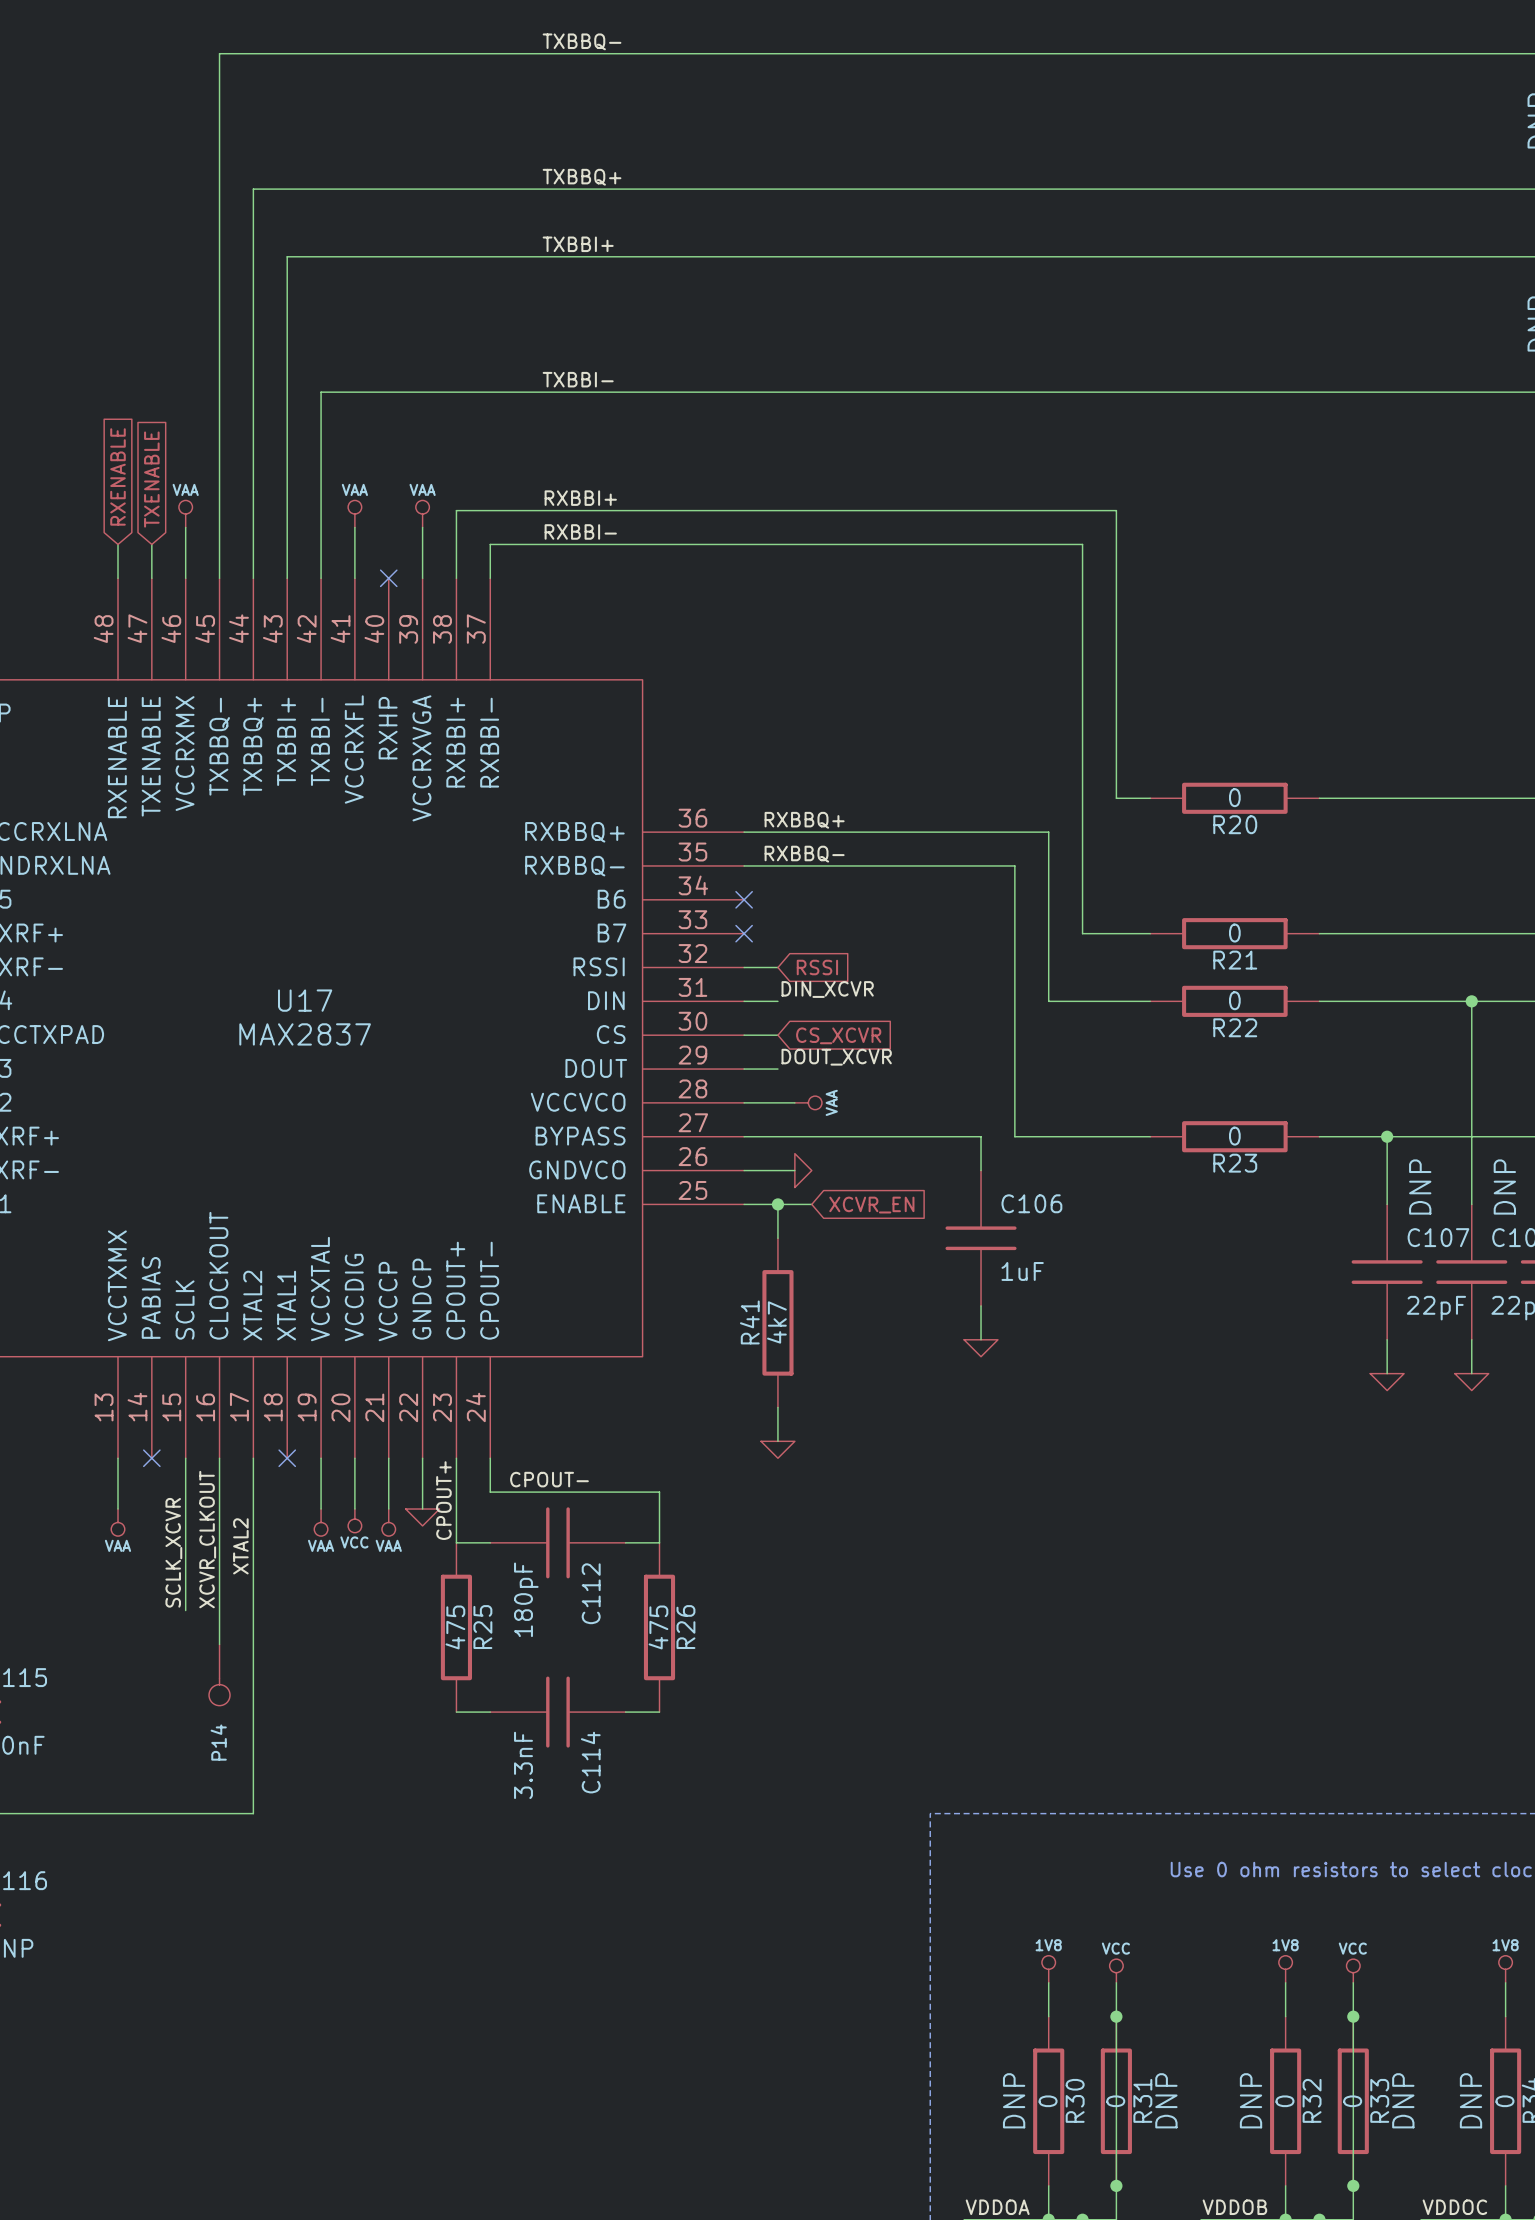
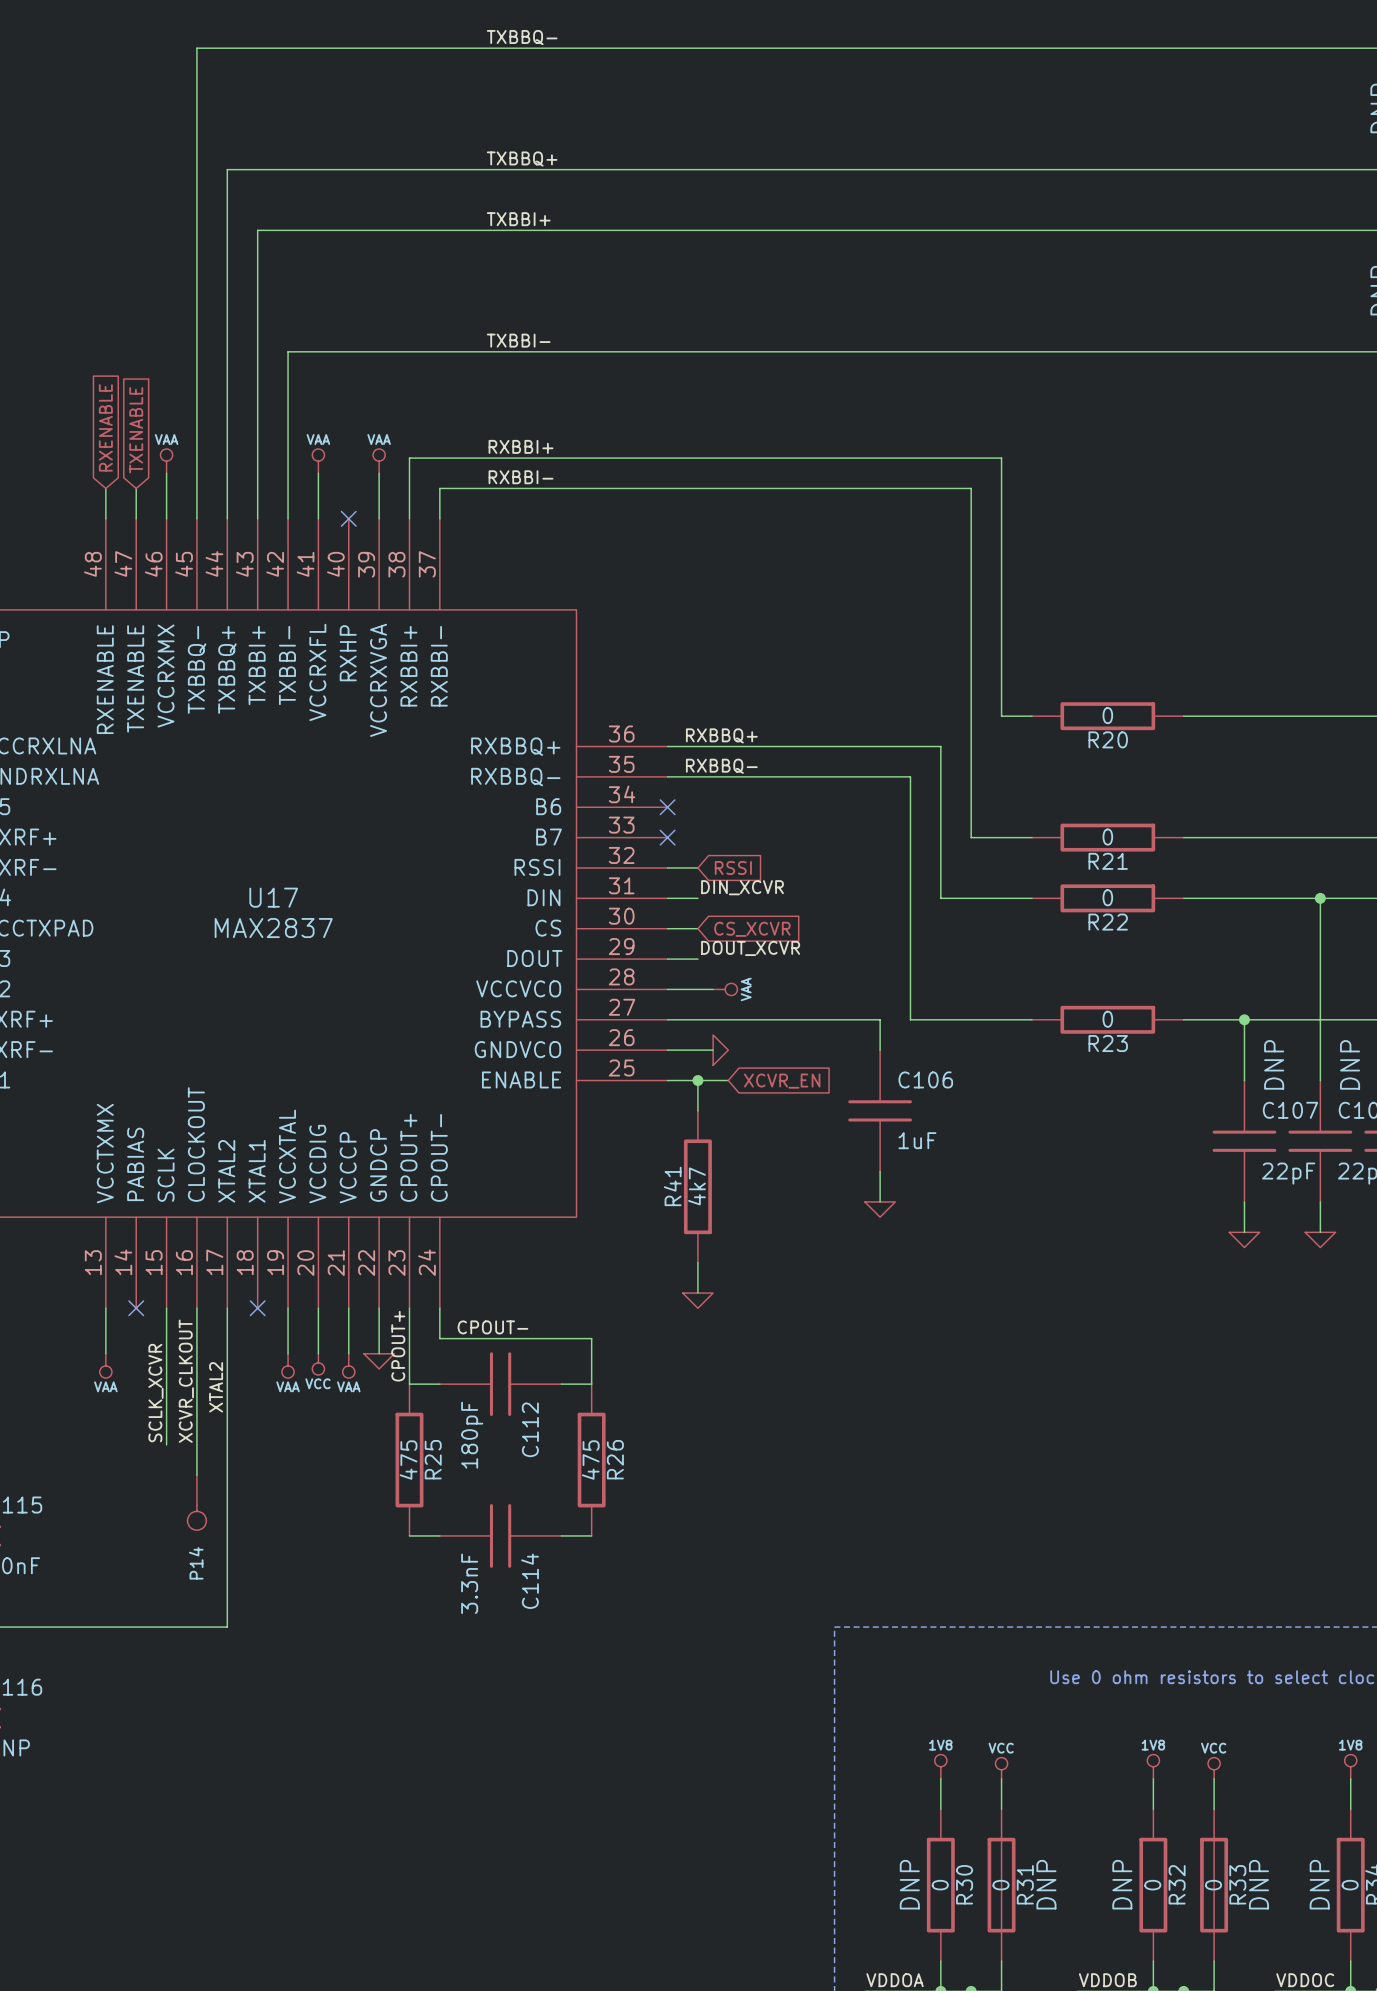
R31 symbol: [1100, 2016, 1132, 2186] -> [987, 1809, 1016, 1962]
junction: (1116, 2016) -> none
R33 symbol: [1337, 2016, 1369, 2186] -> [1200, 1809, 1229, 1962]
junction: (1353, 2016) -> none
junction: (1116, 2185) -> none
junction: (1353, 2185) -> none

